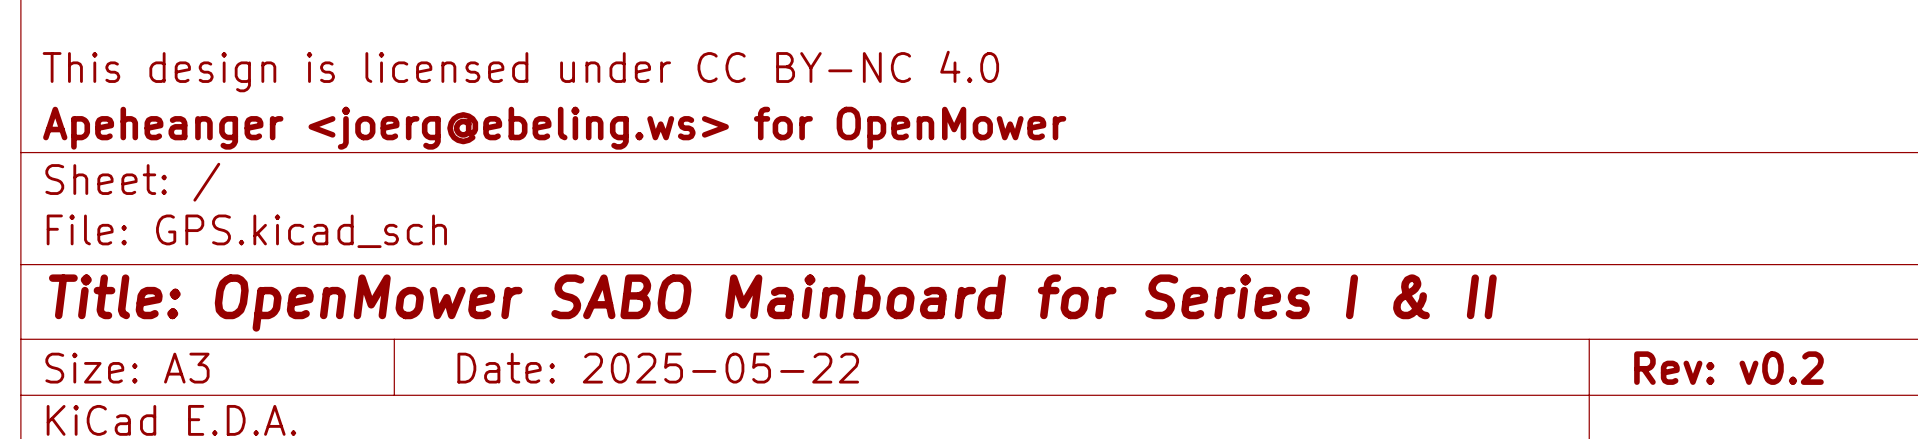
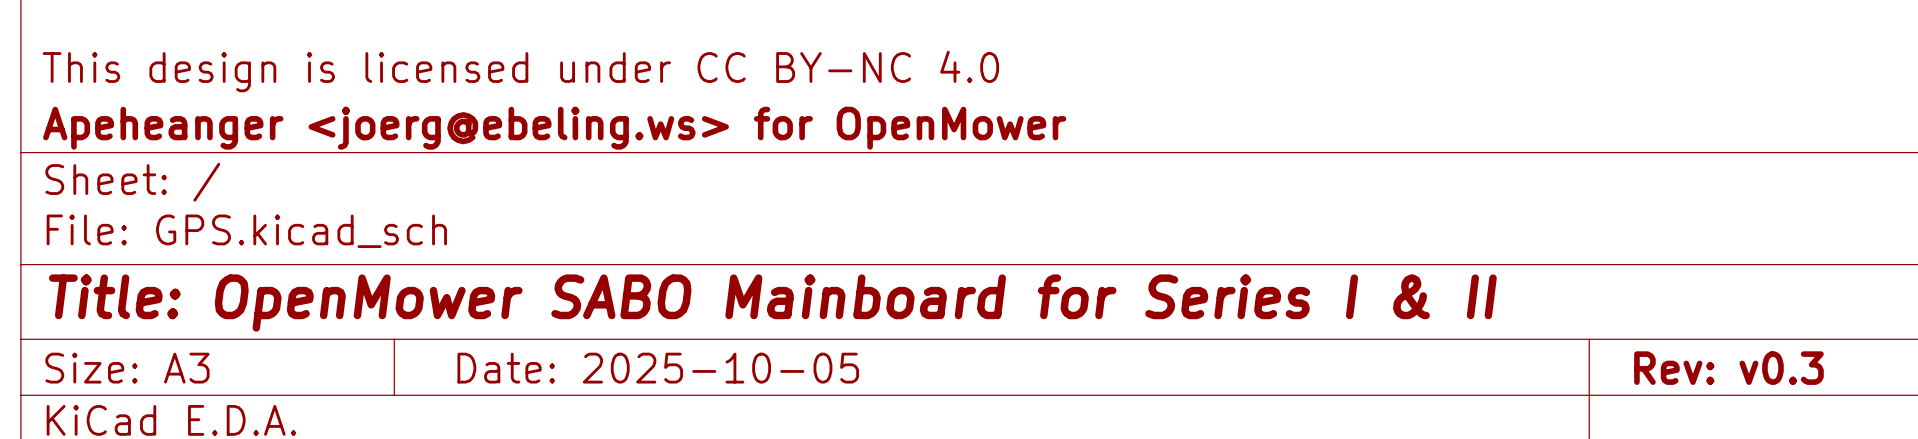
title block: Date: 2025-05-22 (658, 368) -> Date: 2025-10-05 (658, 368)
title block: Rev: v0.2 (1728, 368) -> Rev: v0.3 (1728, 368)

